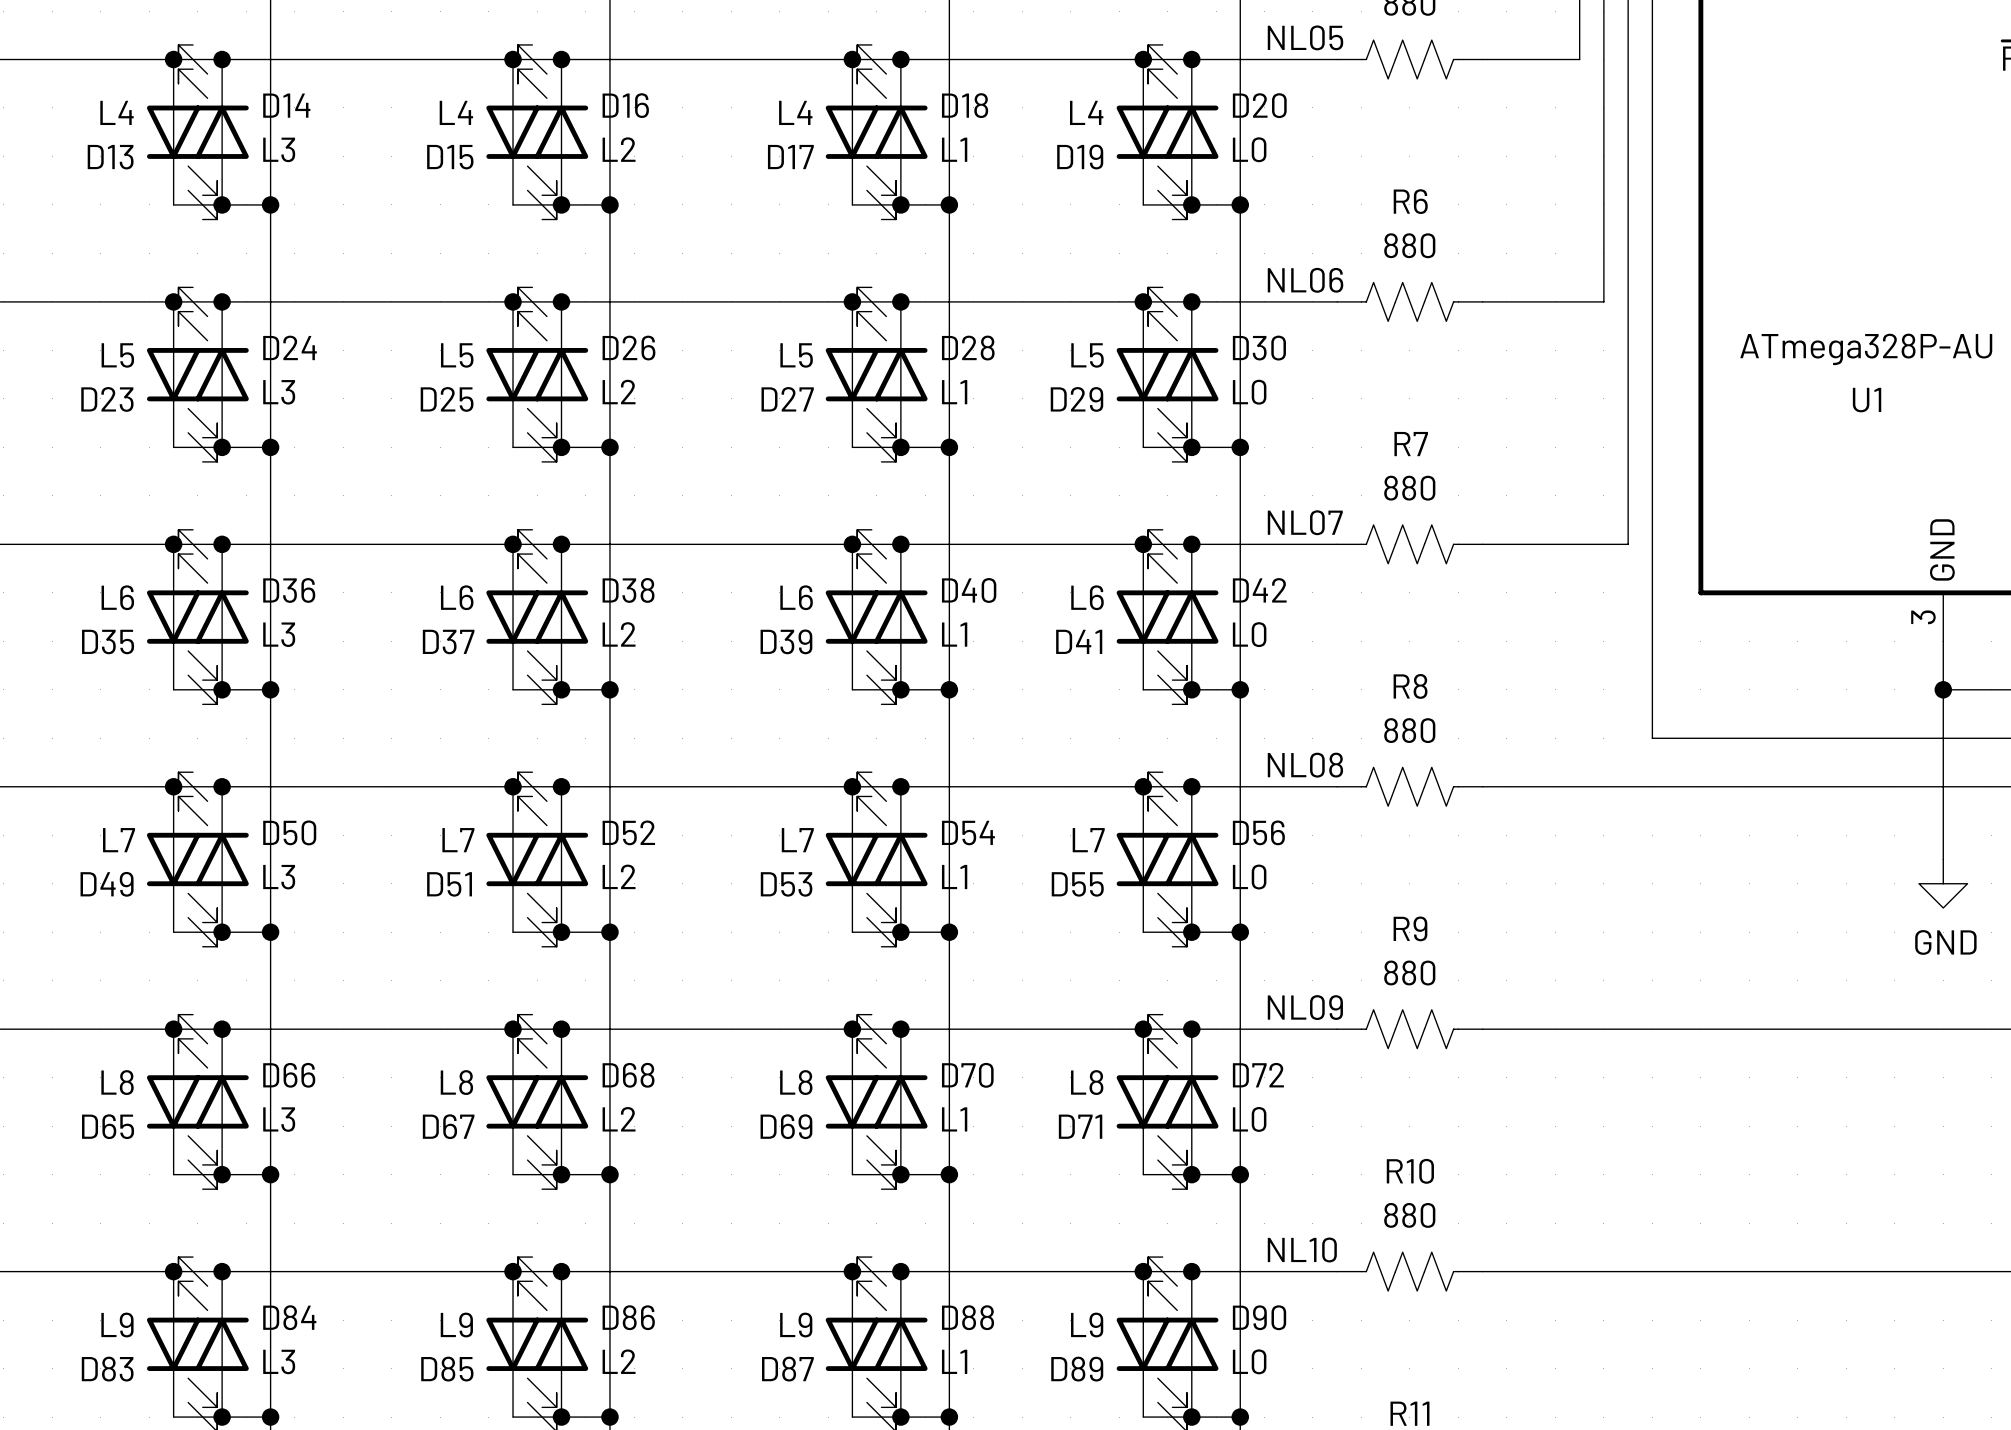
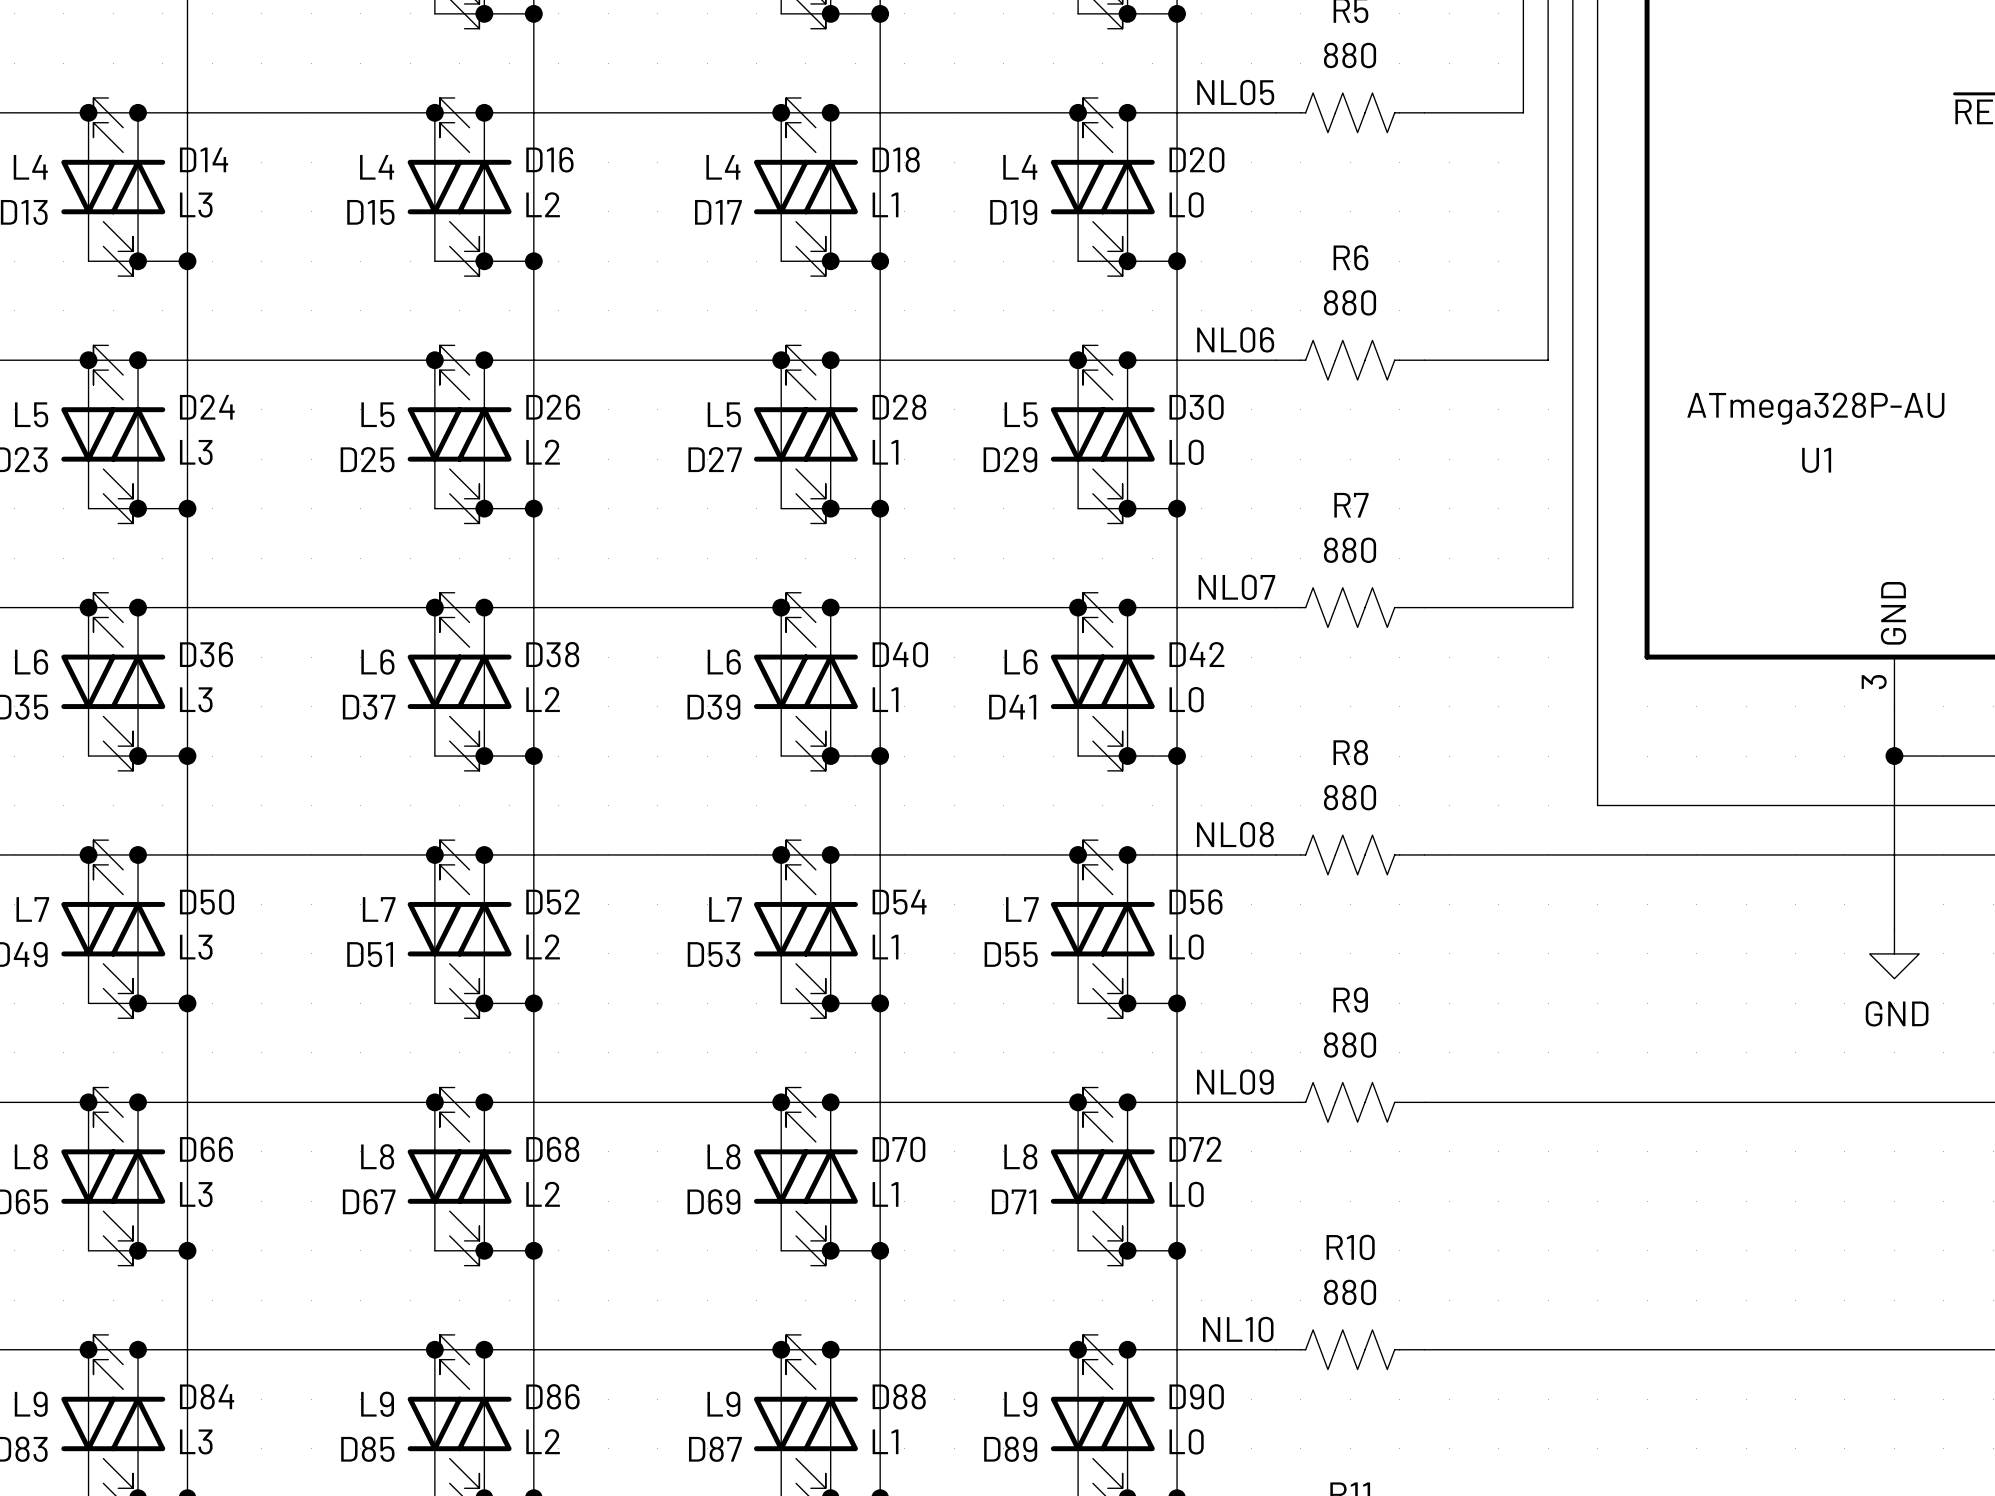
label: NL05 (1305, 37) -> none
text: none -> NL05 (1235, 92)
label: NL06 (1305, 280) -> none
text: none -> NL06 (1235, 339)
label: NL07 (1305, 522) -> none
text: none -> NL07 (1236, 587)
label: NL08 (1305, 765) -> none
text: none -> NL08 (1235, 834)
label: NL09 (1305, 1007) -> none
text: none -> NL09 (1235, 1082)
label: NL10 (1302, 1249) -> none
text: none -> NL10 (1238, 1329)

